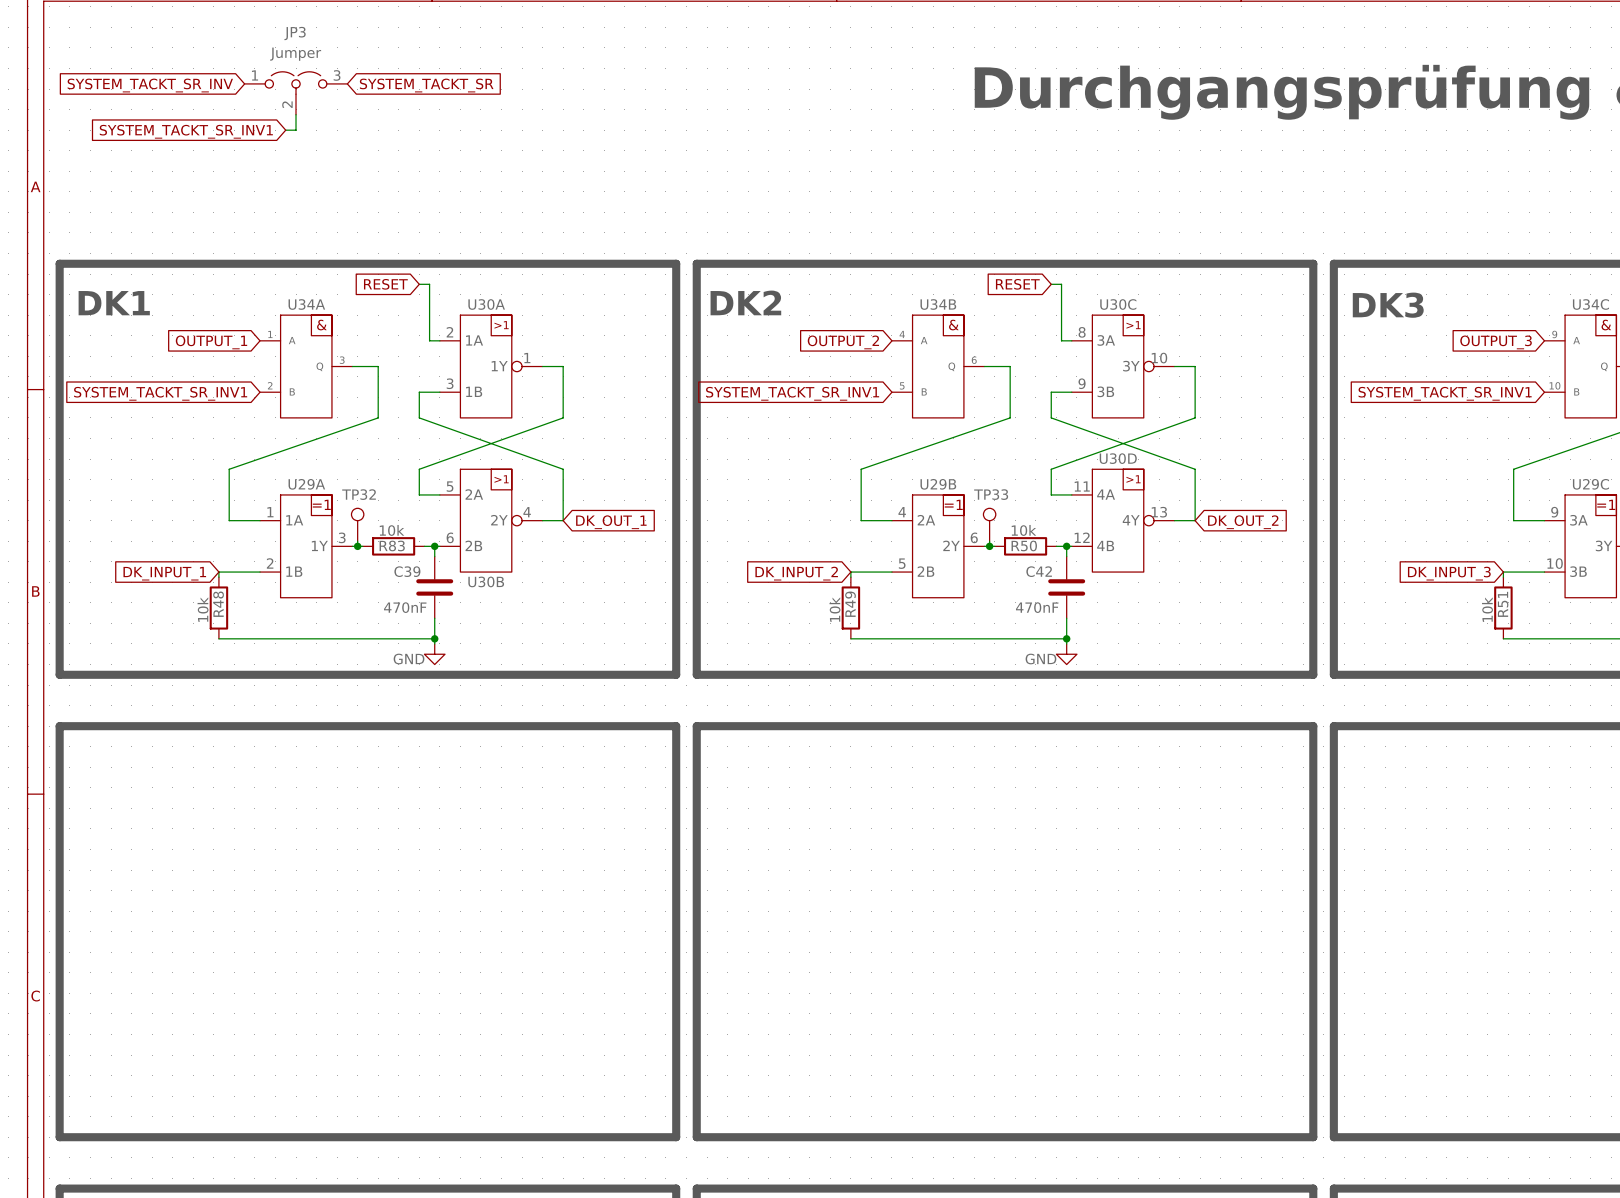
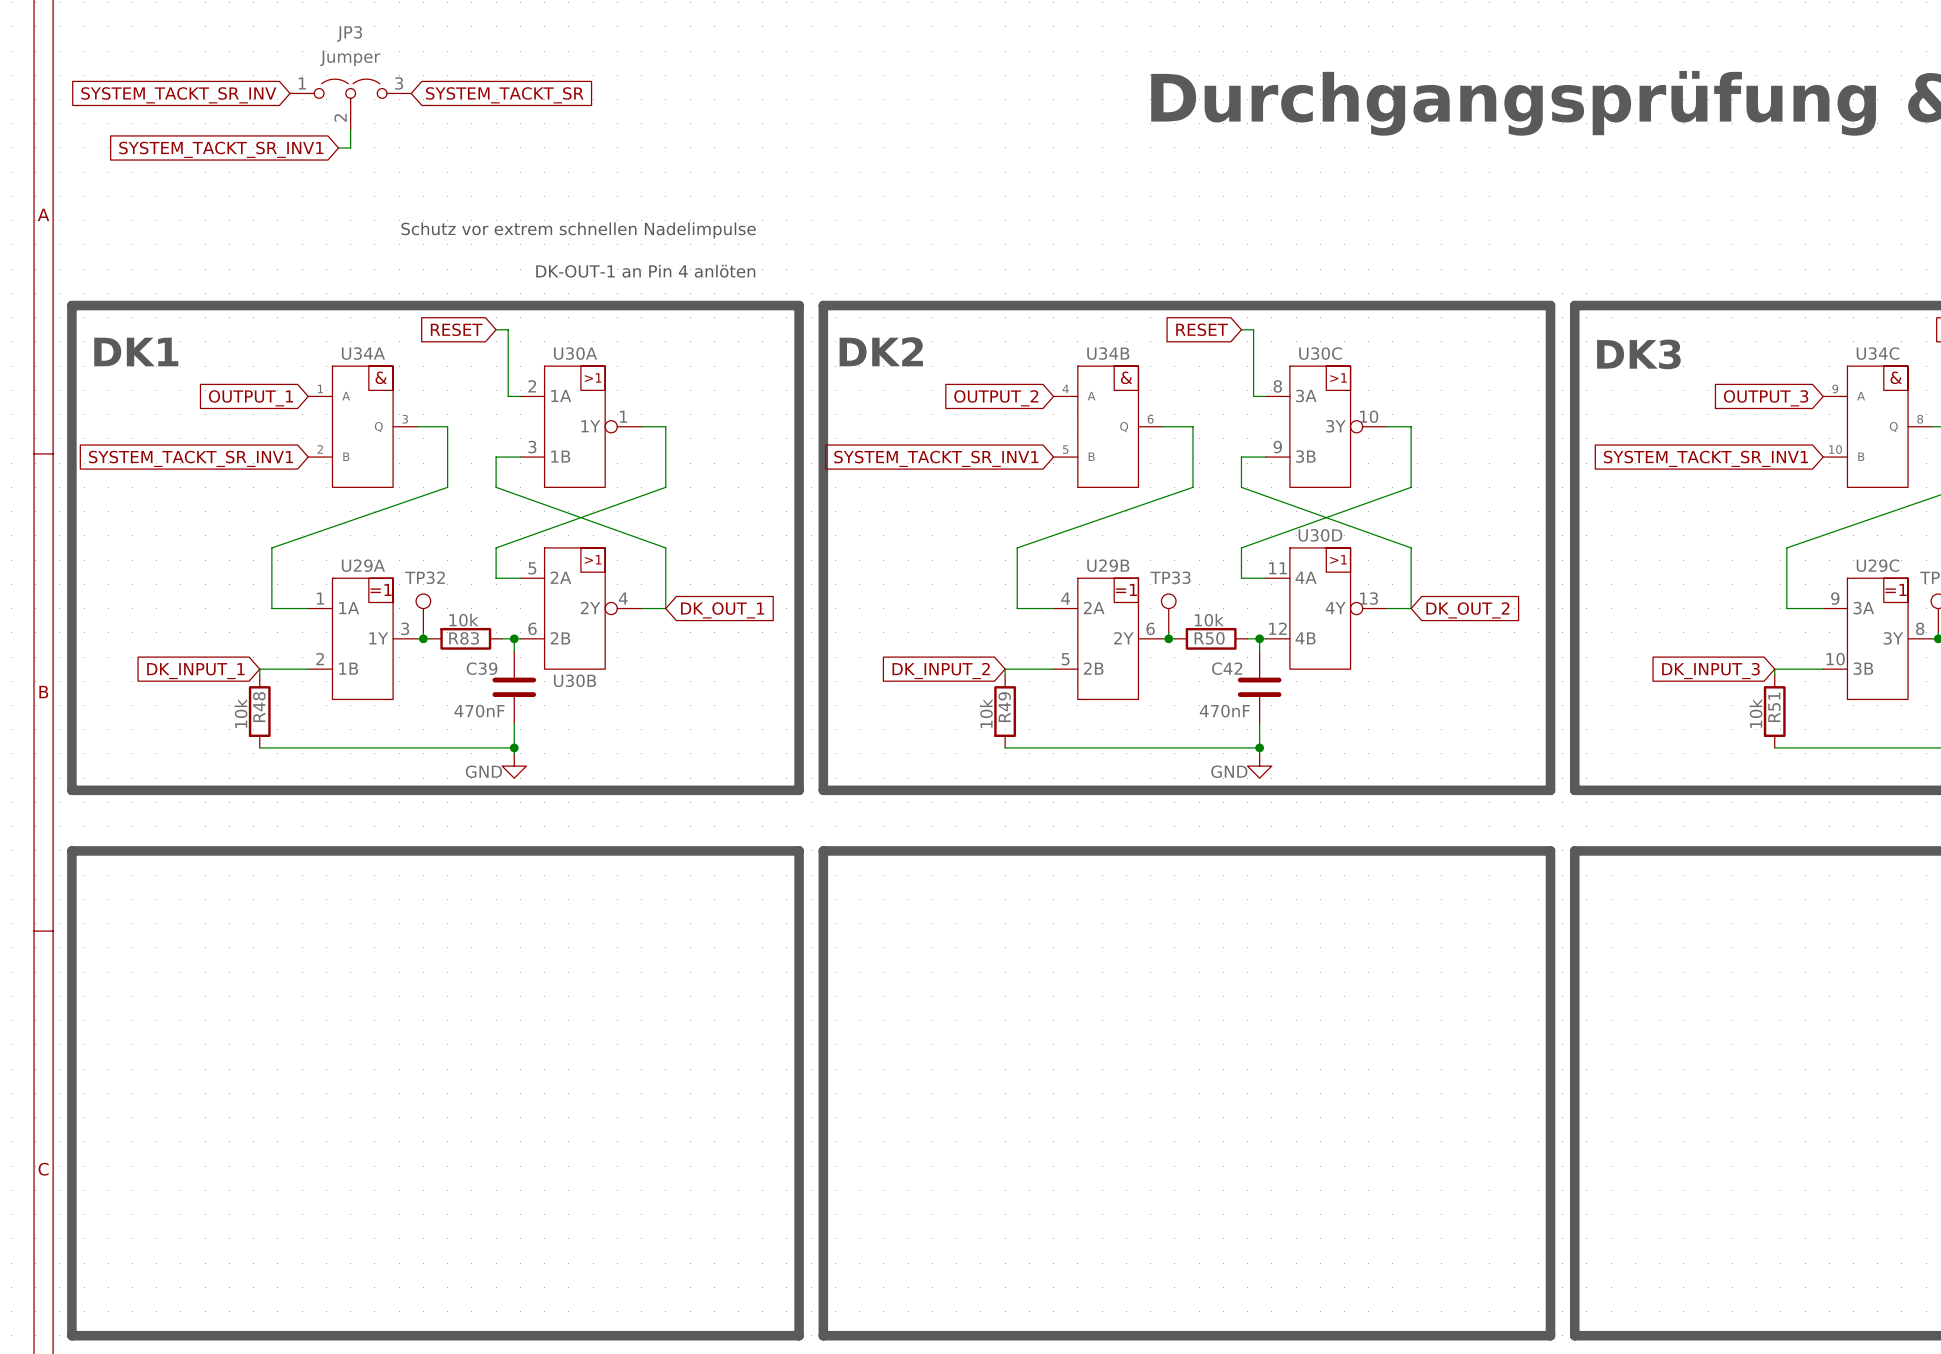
text: none -> Schutz vor extrem schnellen Nadelimpulse (578, 230)
text: none -> DK-OUT-1 an Pin 4 anlöten (645, 271)

